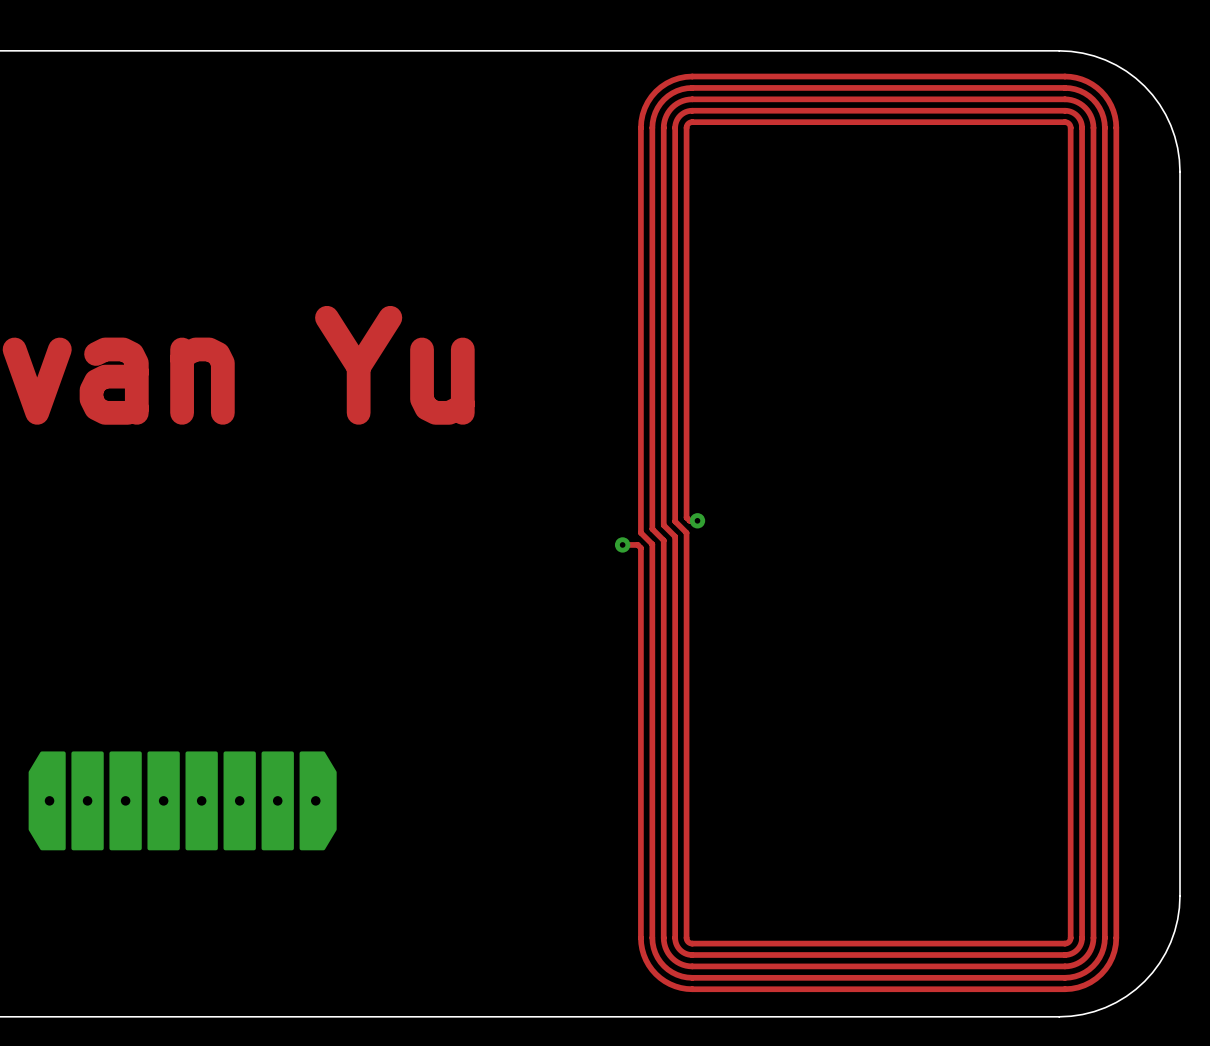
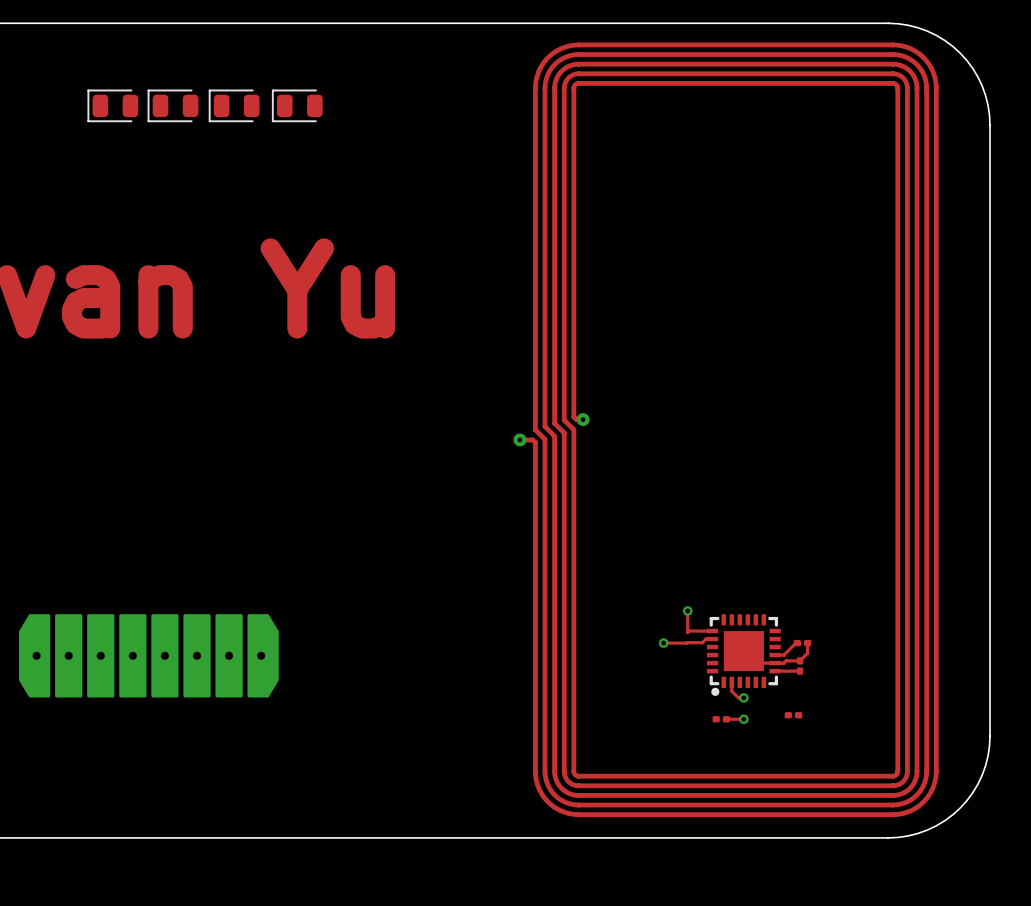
part: none -> (112, 105)
part: none -> (172, 105)
part: none -> (234, 105)
part: none -> (297, 105)
track: none -> (687, 611) (687, 632) (712, 631)
via: none -> (687, 611)
track: none -> (712, 639) (706, 639) (702, 642) (663, 643)
via: none -> (663, 643)
track: none -> (797, 643) (783, 655) (775, 655)
part: none -> (802, 643)
track: none -> (807, 643) (807, 653) (799, 660) (786, 660) (783, 663) (755, 663) (743, 651)
part: none -> (743, 655)
part: none -> (799, 666)
track: none -> (775, 671) (799, 671)
track: none -> (731, 682) (731, 691) (738, 697) (743, 697)
via: none -> (743, 697)
part: none -> (793, 715)
part: none -> (721, 719)
track: none -> (726, 719) (743, 719)
via: none -> (743, 719)

